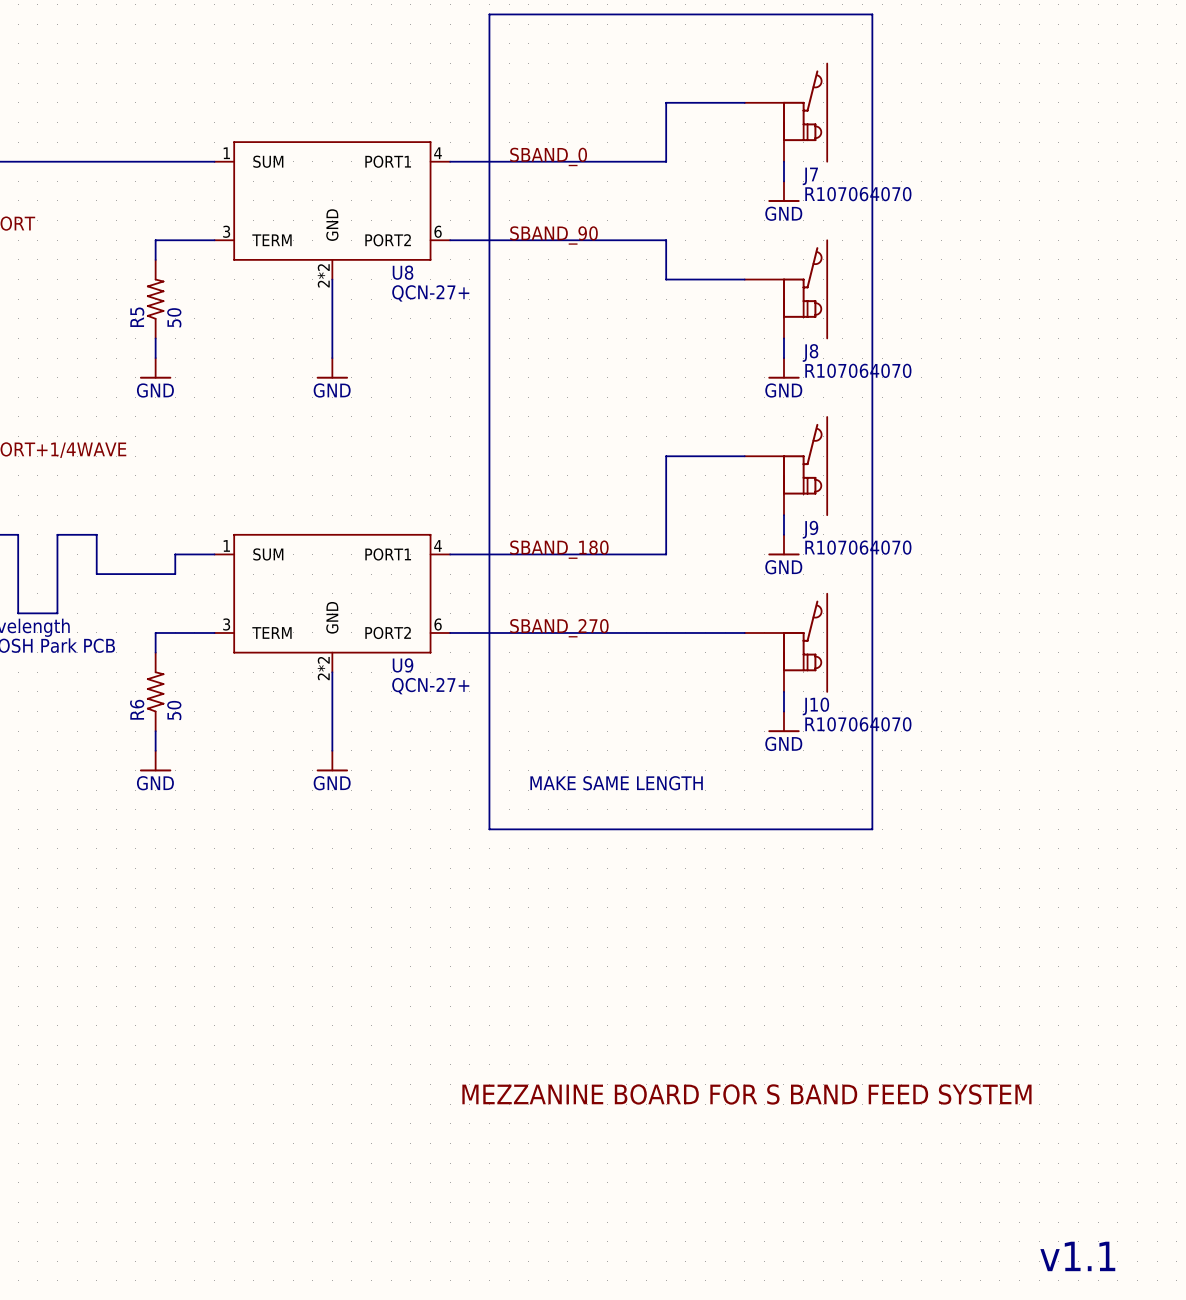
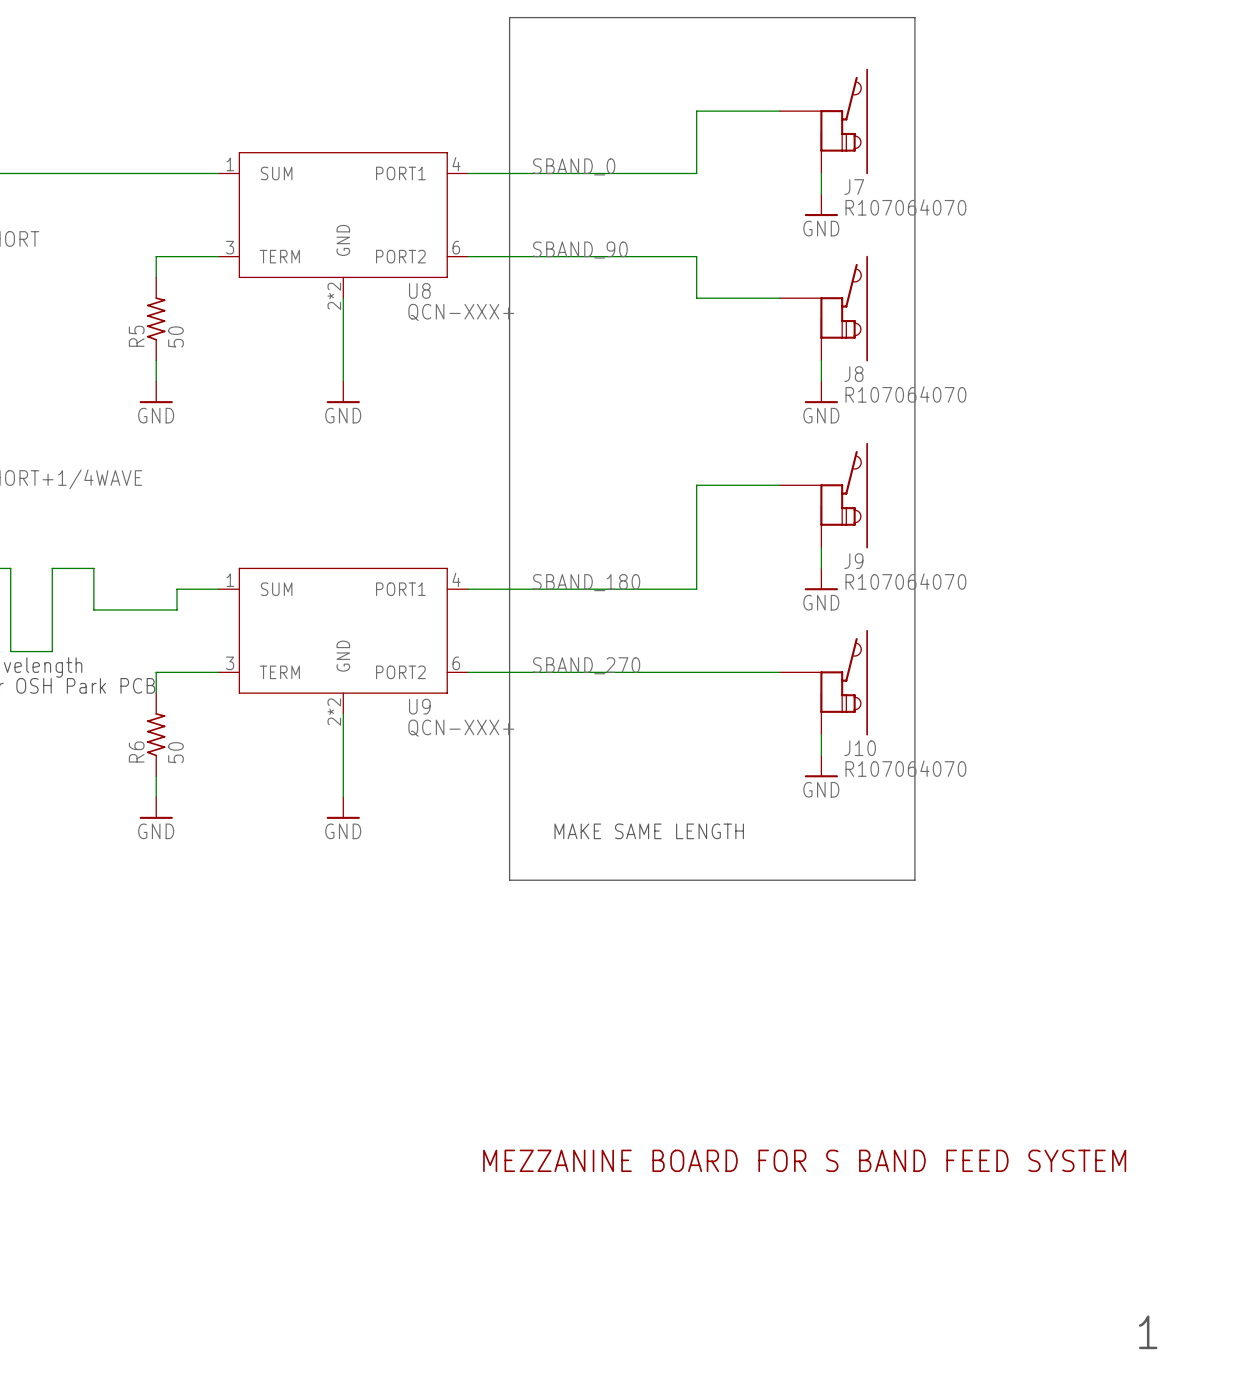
U8 value: QCN-27+ (430, 293) -> QCN-XXX+ (461, 312)
U9 value: QCN-27+ (430, 686) -> QCN-XXX+ (461, 728)
text: v1.1 (1077, 1256) -> none
text: none -> 1 (1148, 1332)

